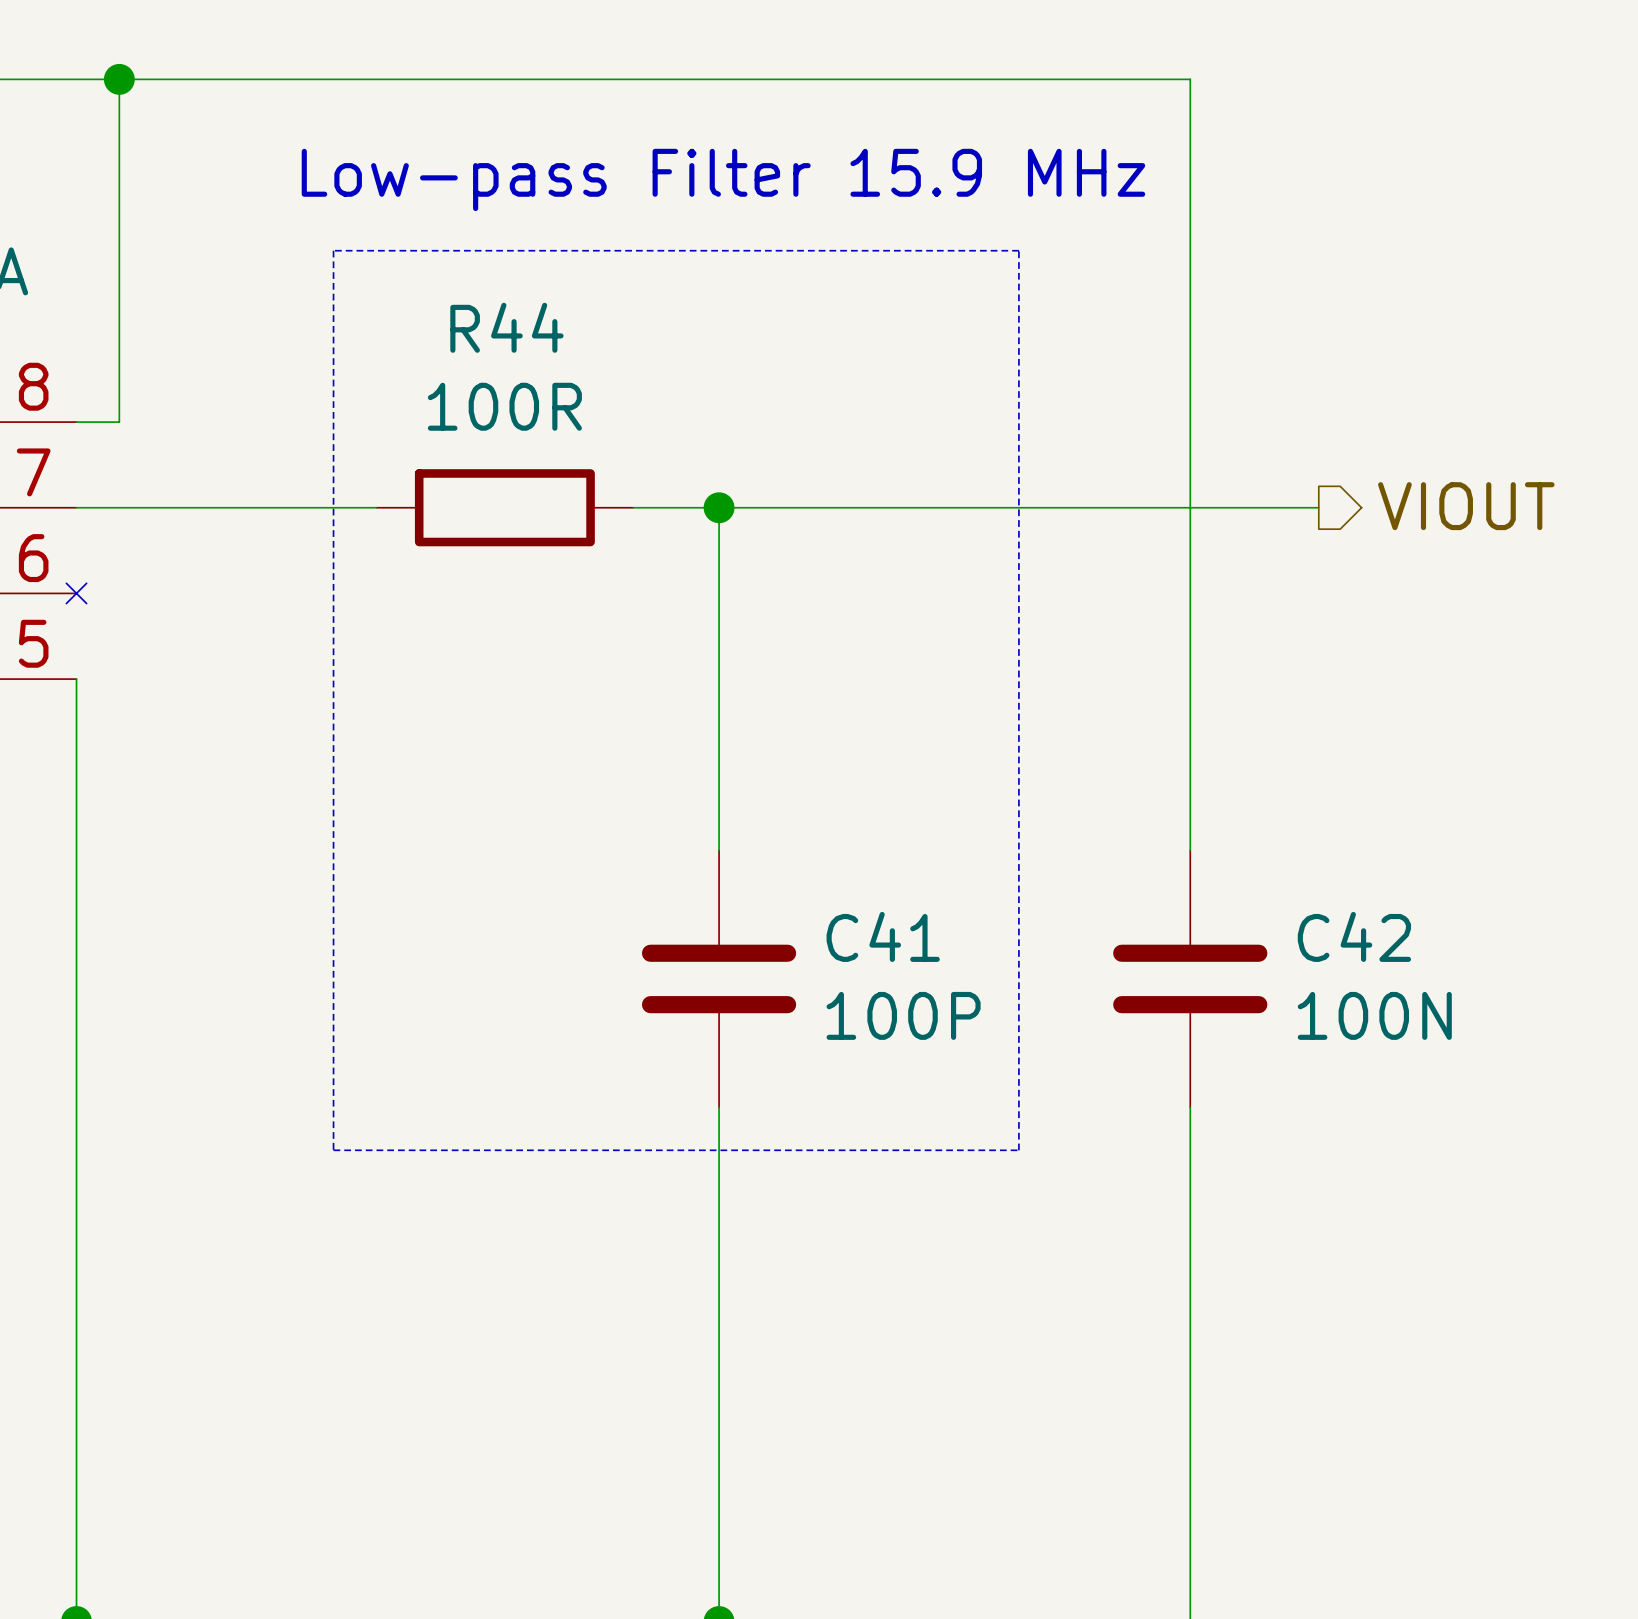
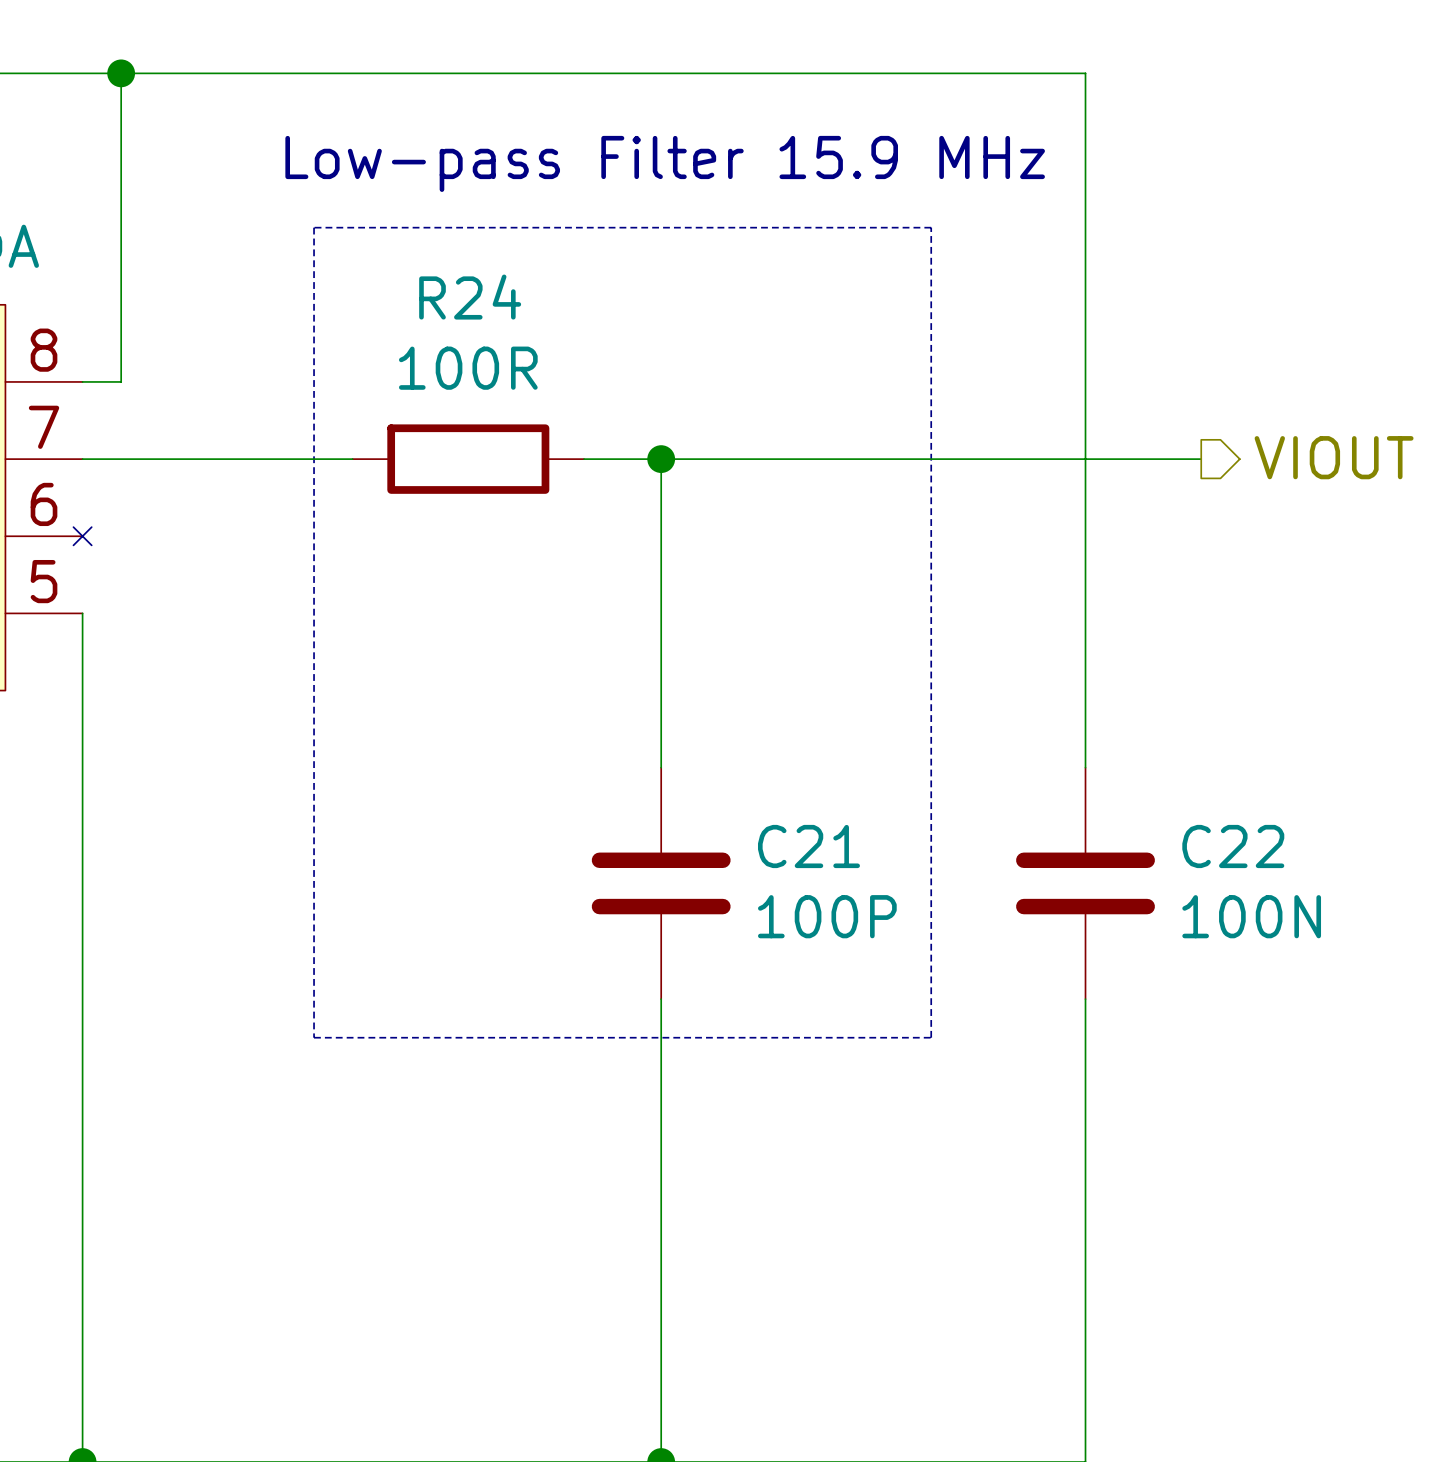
R44 name: R44 (506, 327) -> R24 (470, 297)
C41 name: C41 (883, 936) -> C21 (808, 846)
C42 name: C42 (1354, 936) -> C22 (1233, 846)

